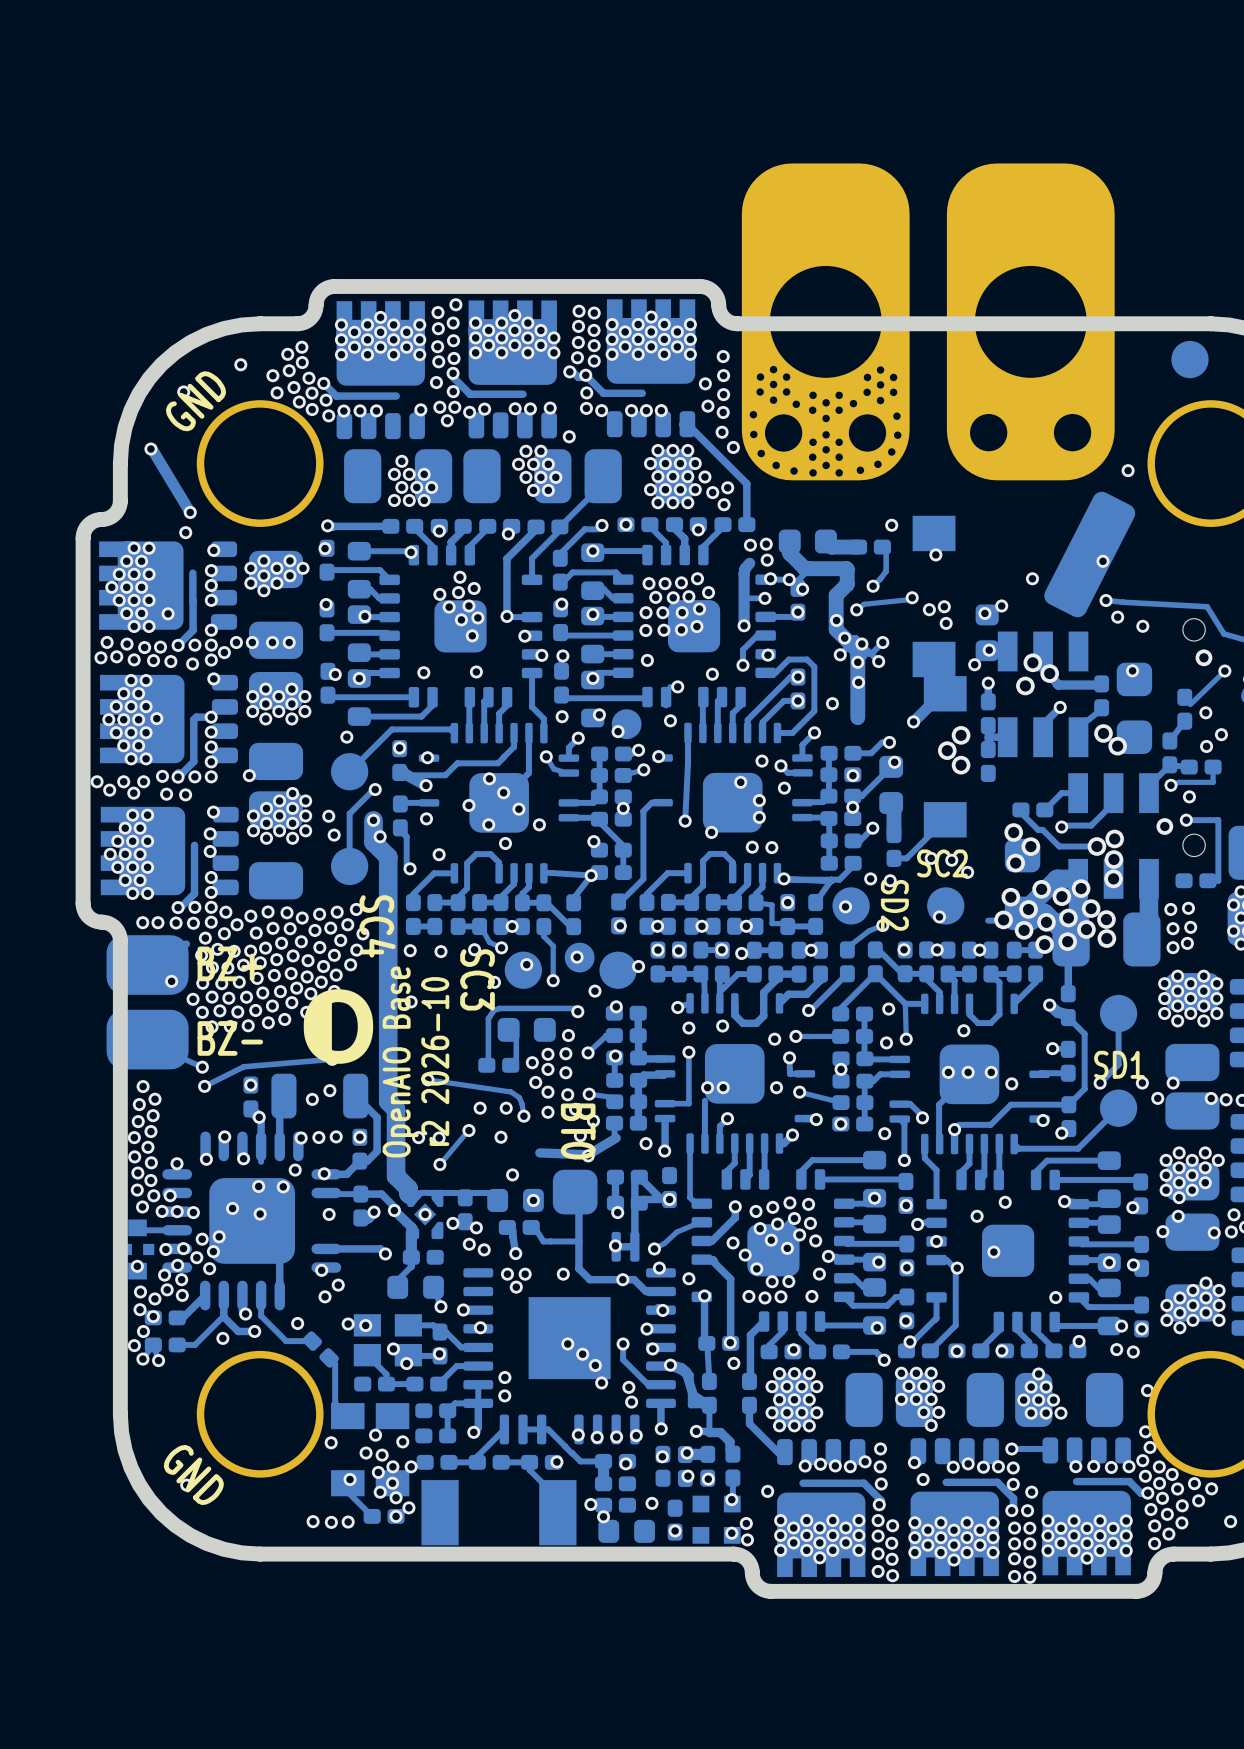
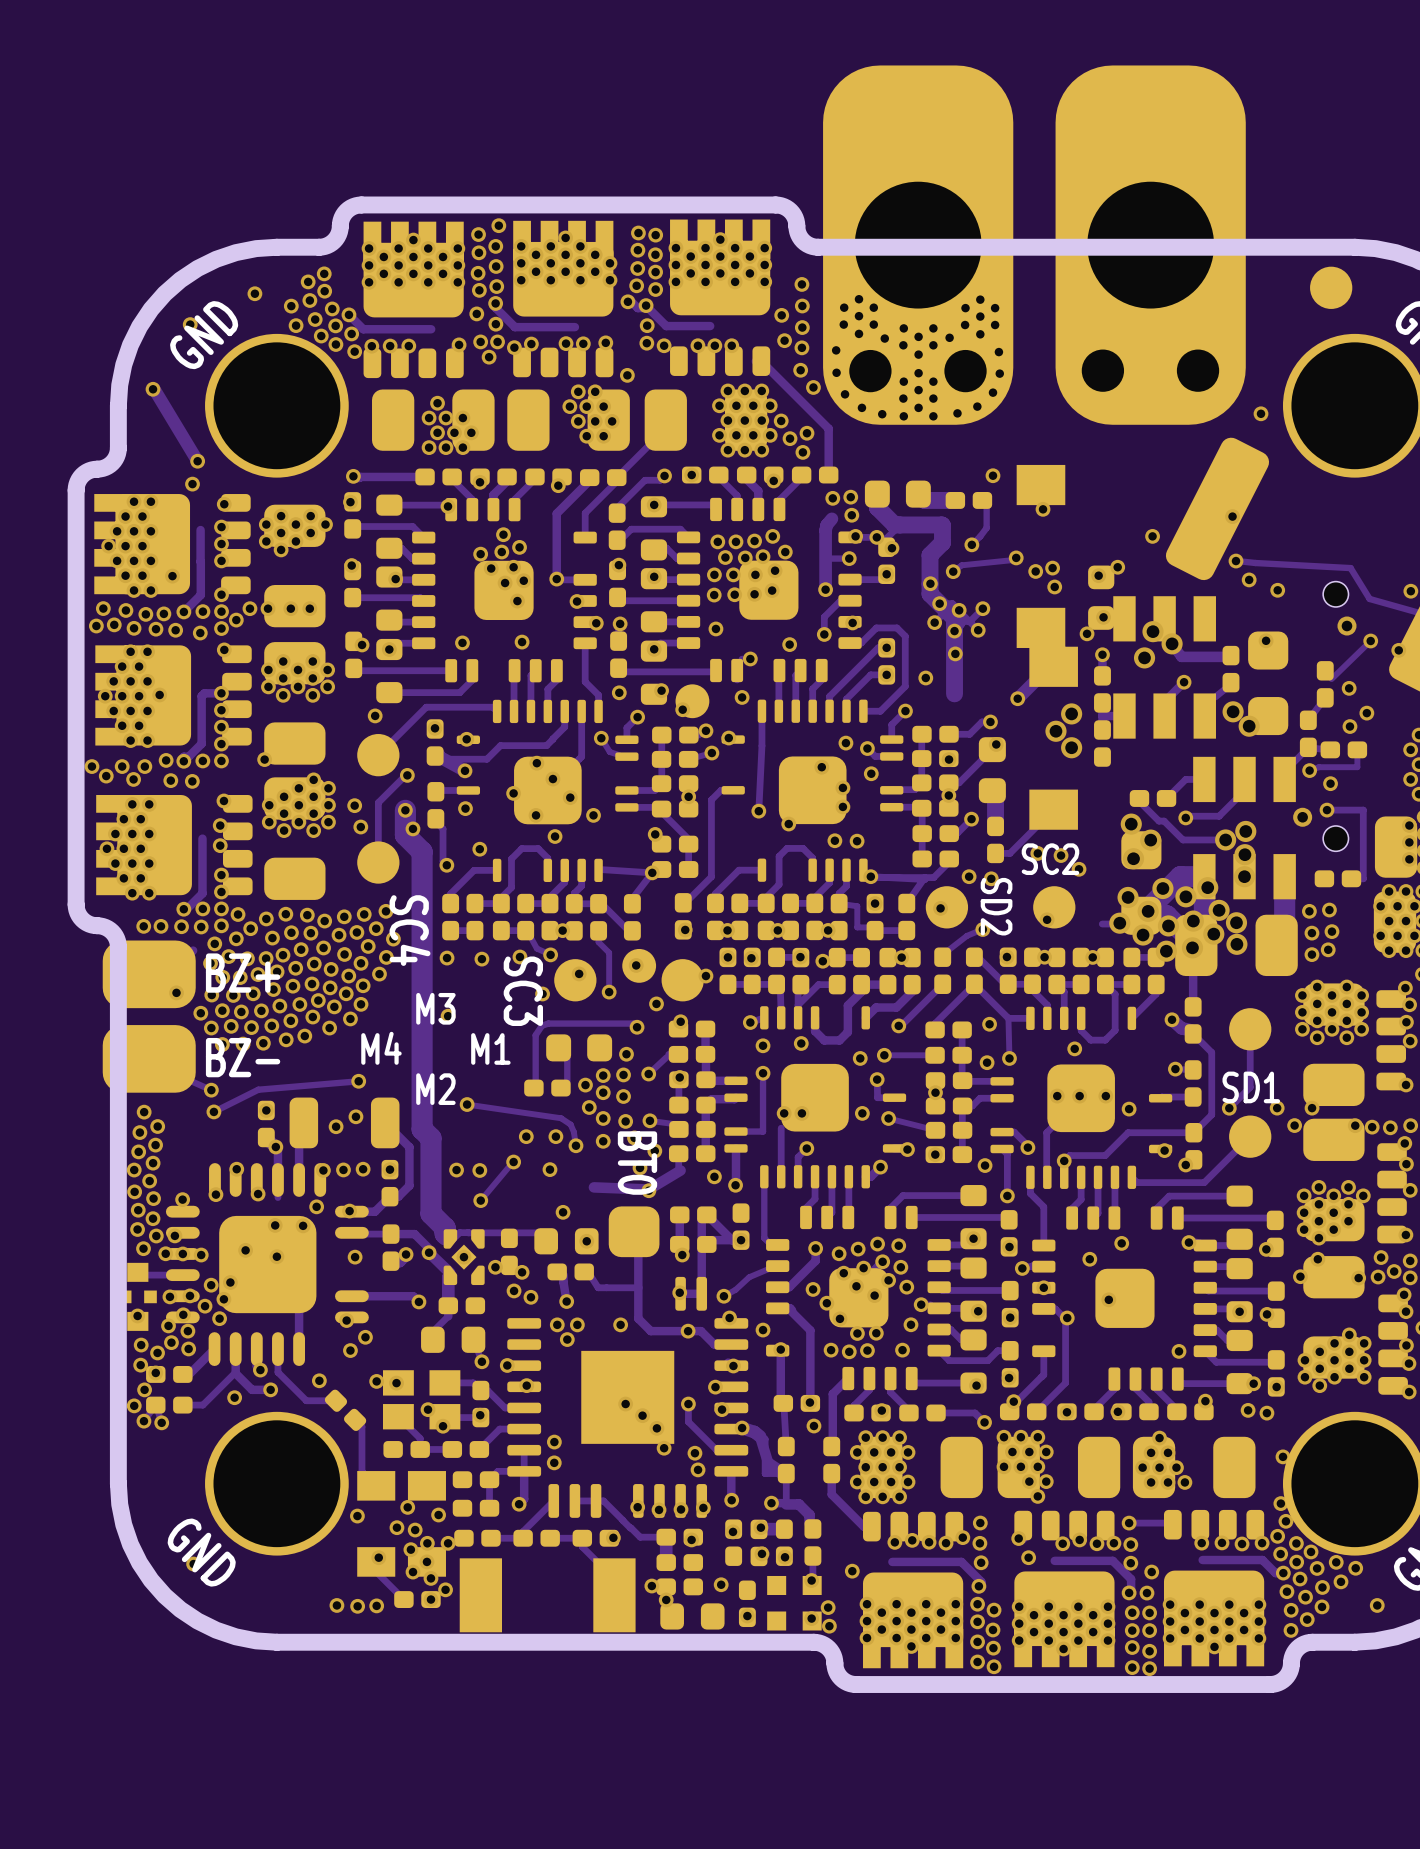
drawing: [303, 989, 374, 1064] -> none
text: none -> M3 (435, 1008)
text: none -> M4 (381, 1048)
text: none -> M1 (490, 1048)
text: OpenAIO Base (400, 1061) -> M2 (435, 1089)
text: r2 2026-10 (435, 1061) -> none

